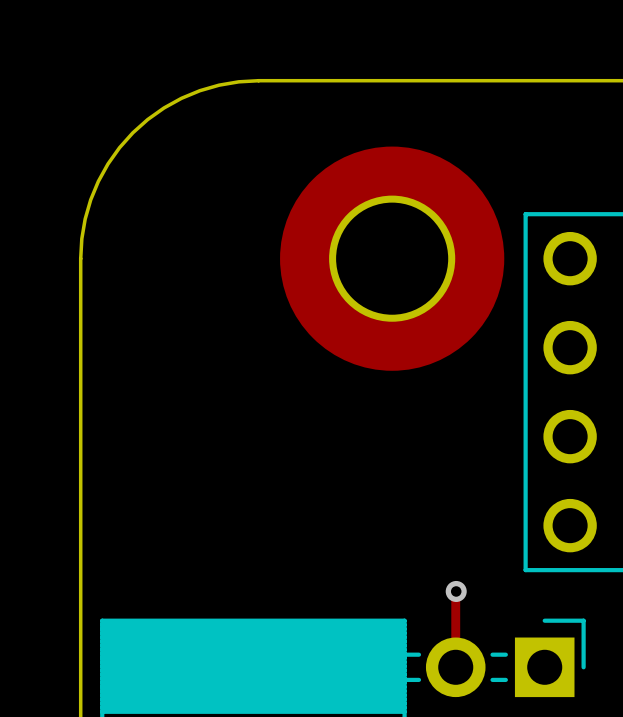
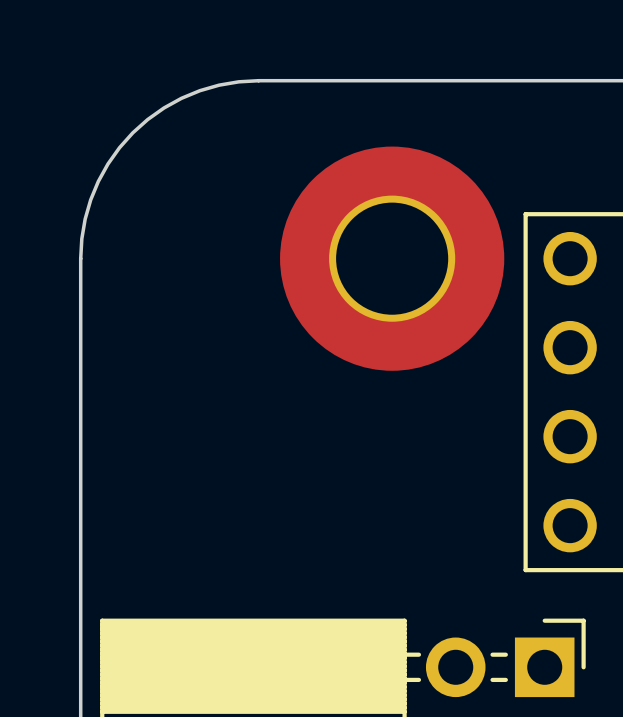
track: (455, 591) (455, 667) -> none
via: (456, 591) -> none

